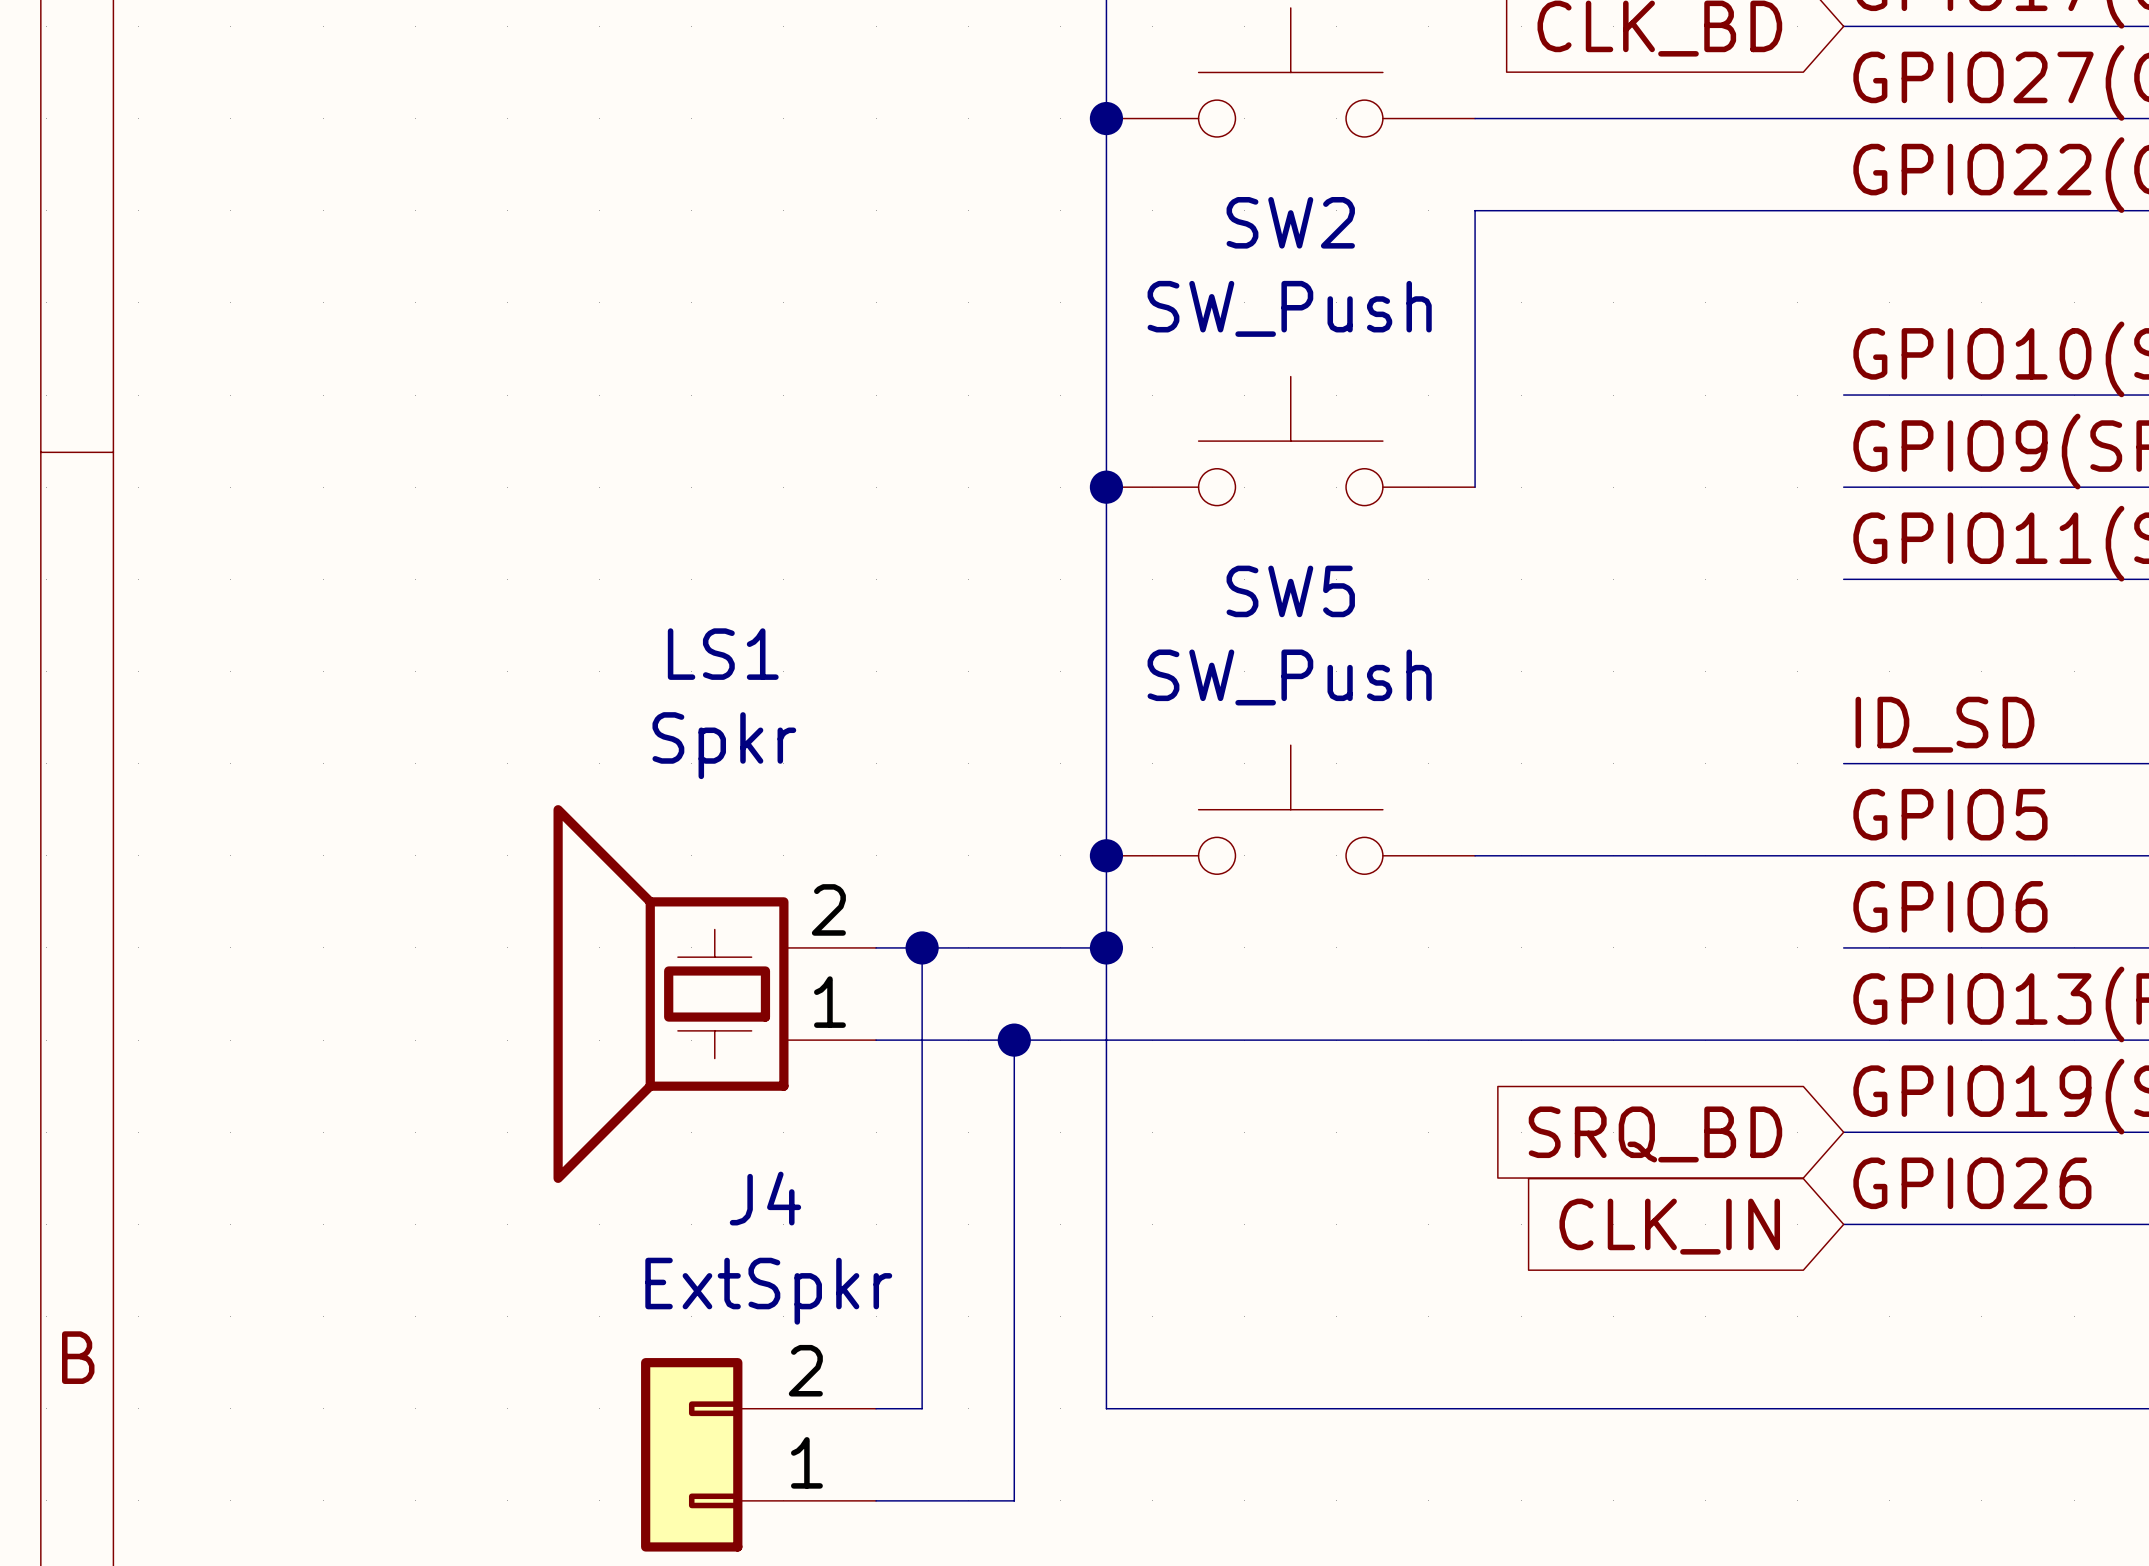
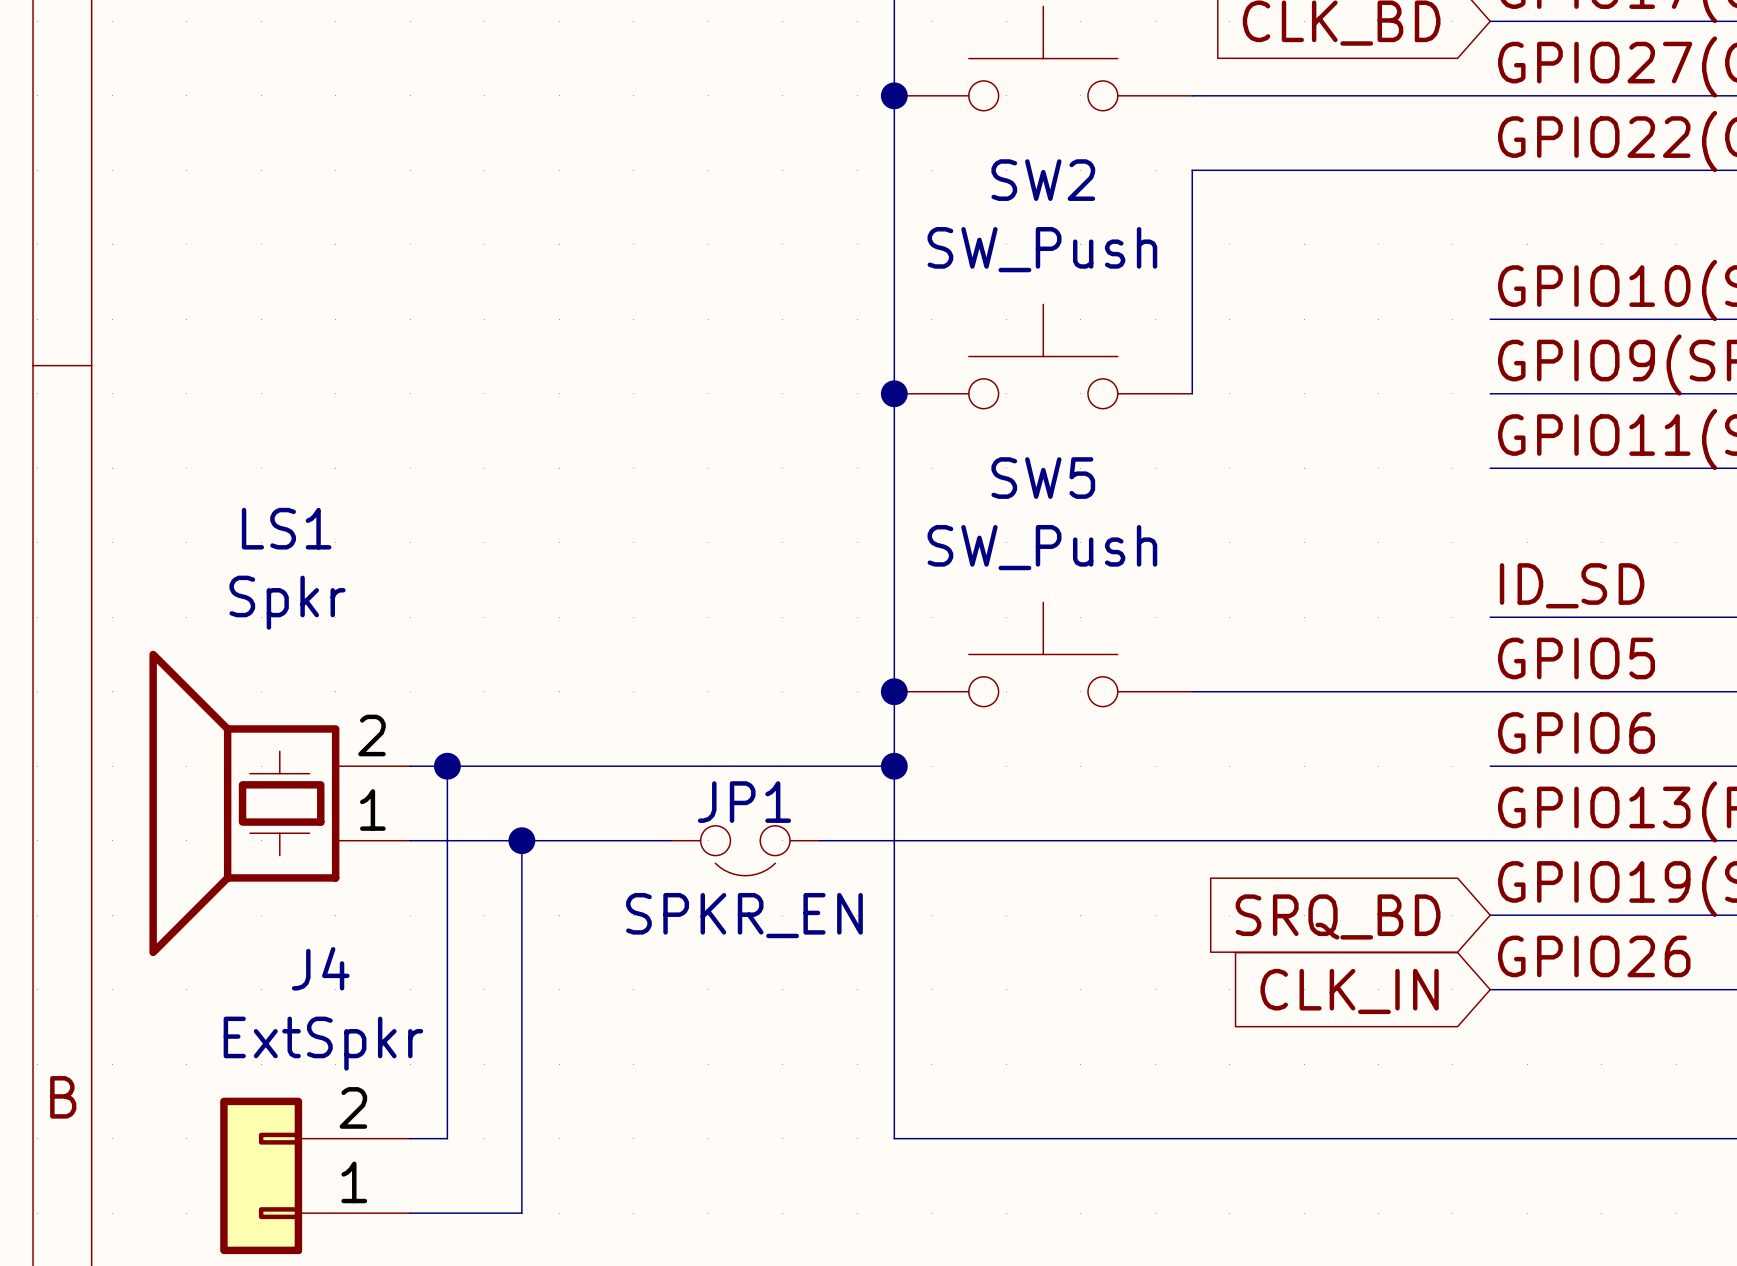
wire: none -> (410, 766) (708, 766)
junction: none -> (447, 766)
wire: (922, 947) (922, 1408) (876, 1408) -> (447, 766) (447, 1138) (410, 1138)
junction: (922, 947) -> none
LS1 position: (714, 994) -> (279, 803)
wire: none -> (410, 840) (670, 840)
wire: none -> (521, 840) (521, 1213) (410, 1213)
junction: none -> (521, 840)
wire: (876, 1040) (1014, 1040) (1014, 1500) (876, 1500) -> none
junction: (1014, 1040) -> none
JP1: none -> SPKR_EN (745, 850)
J4 position: (758, 1454) -> (315, 1175)

